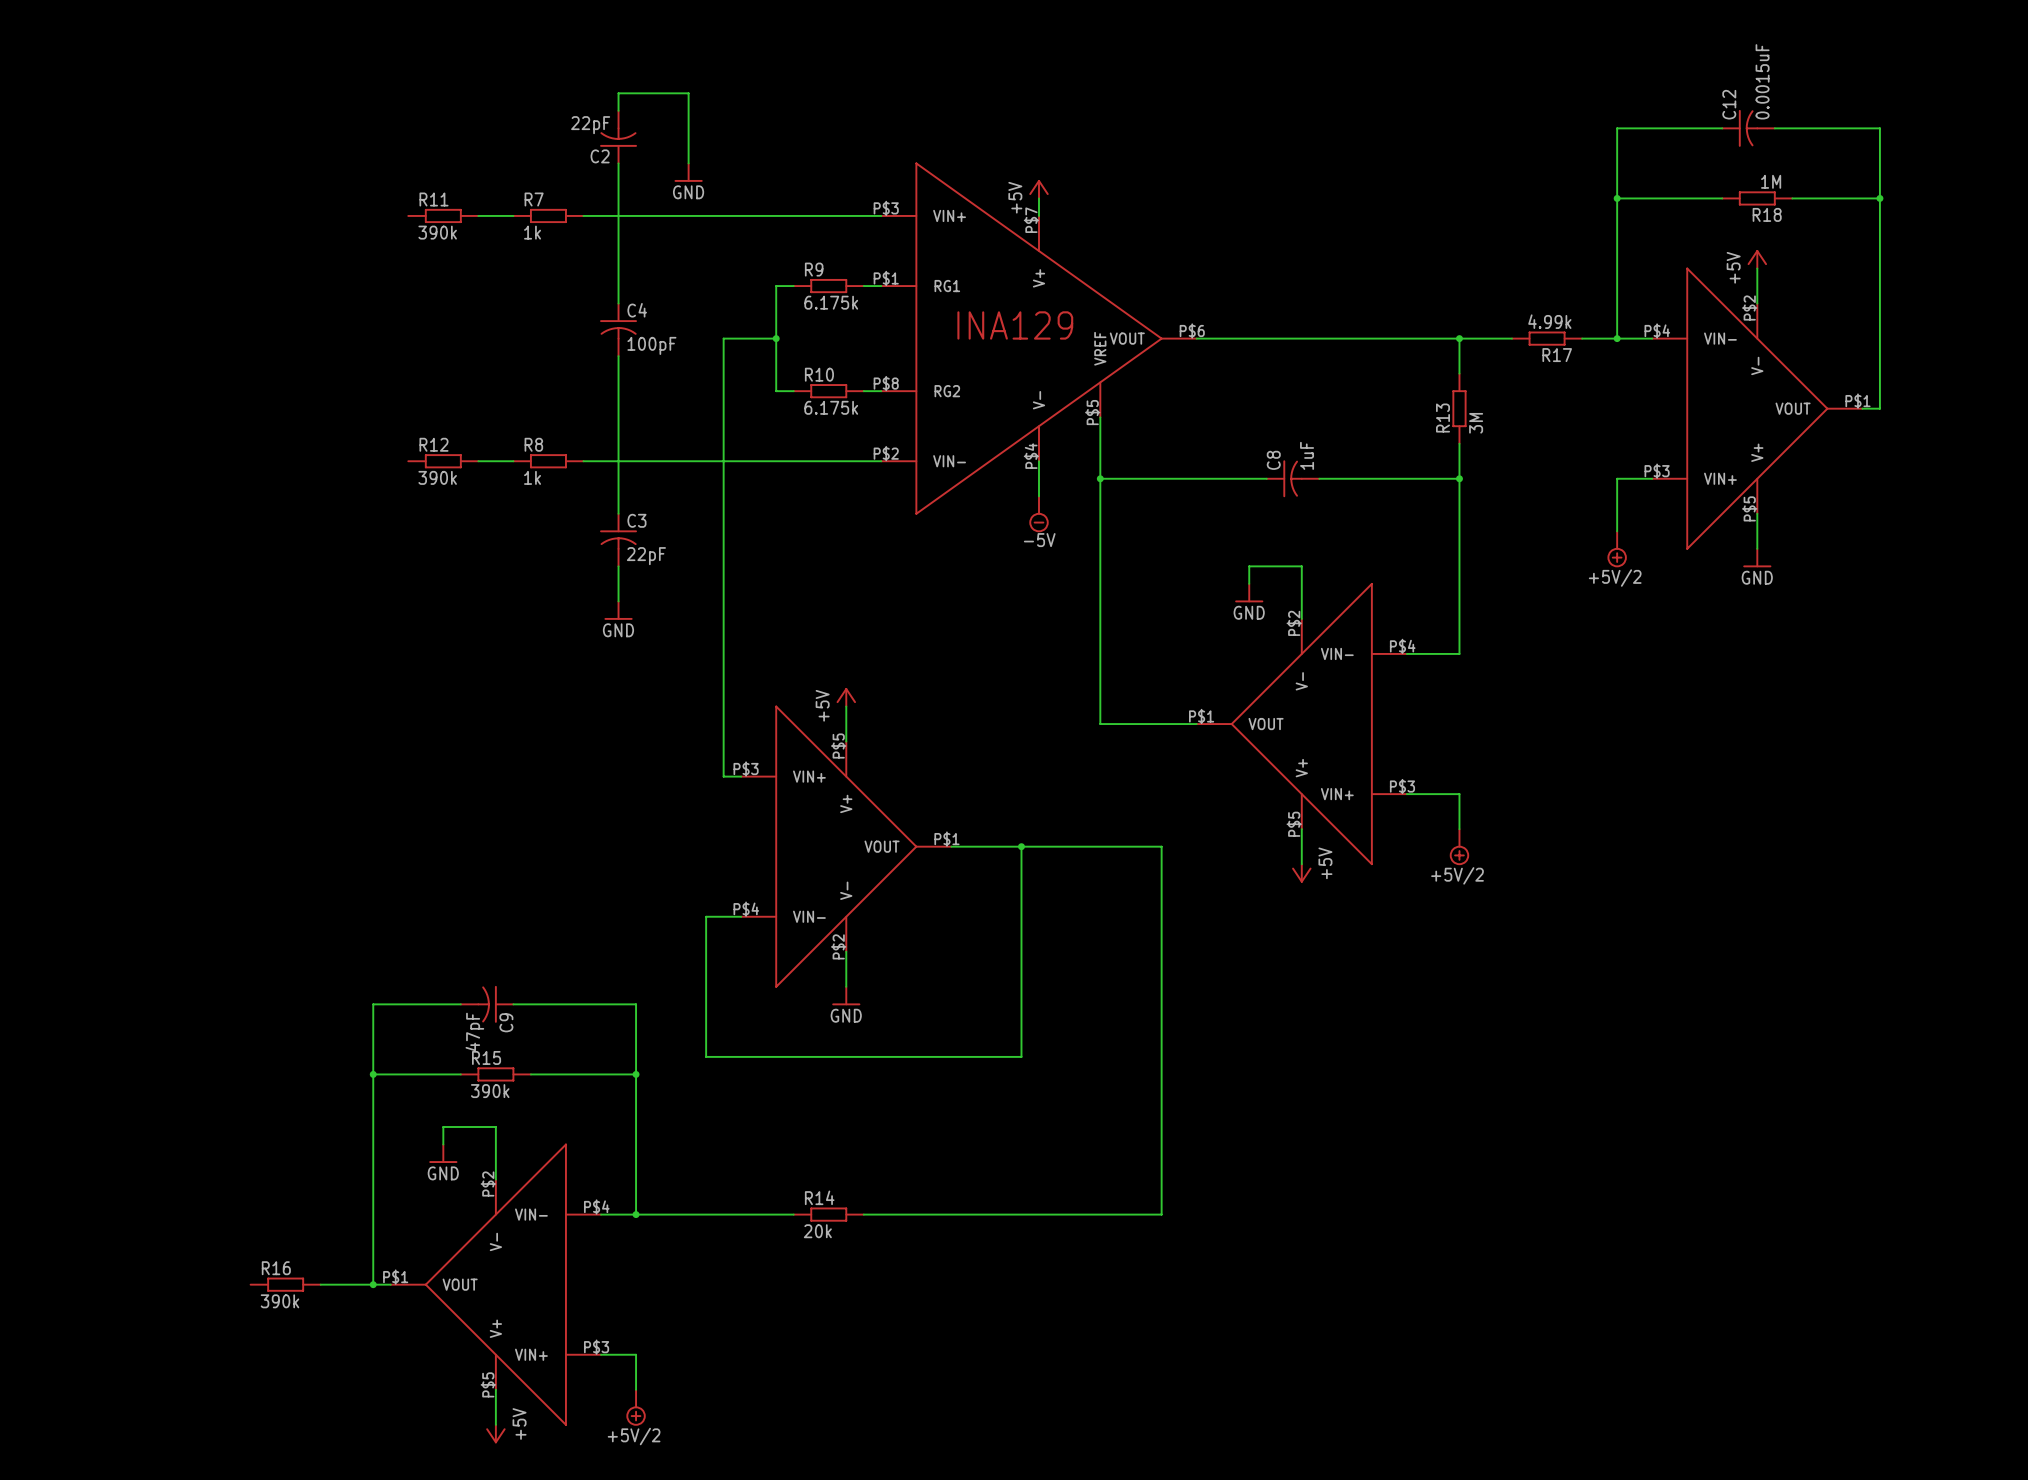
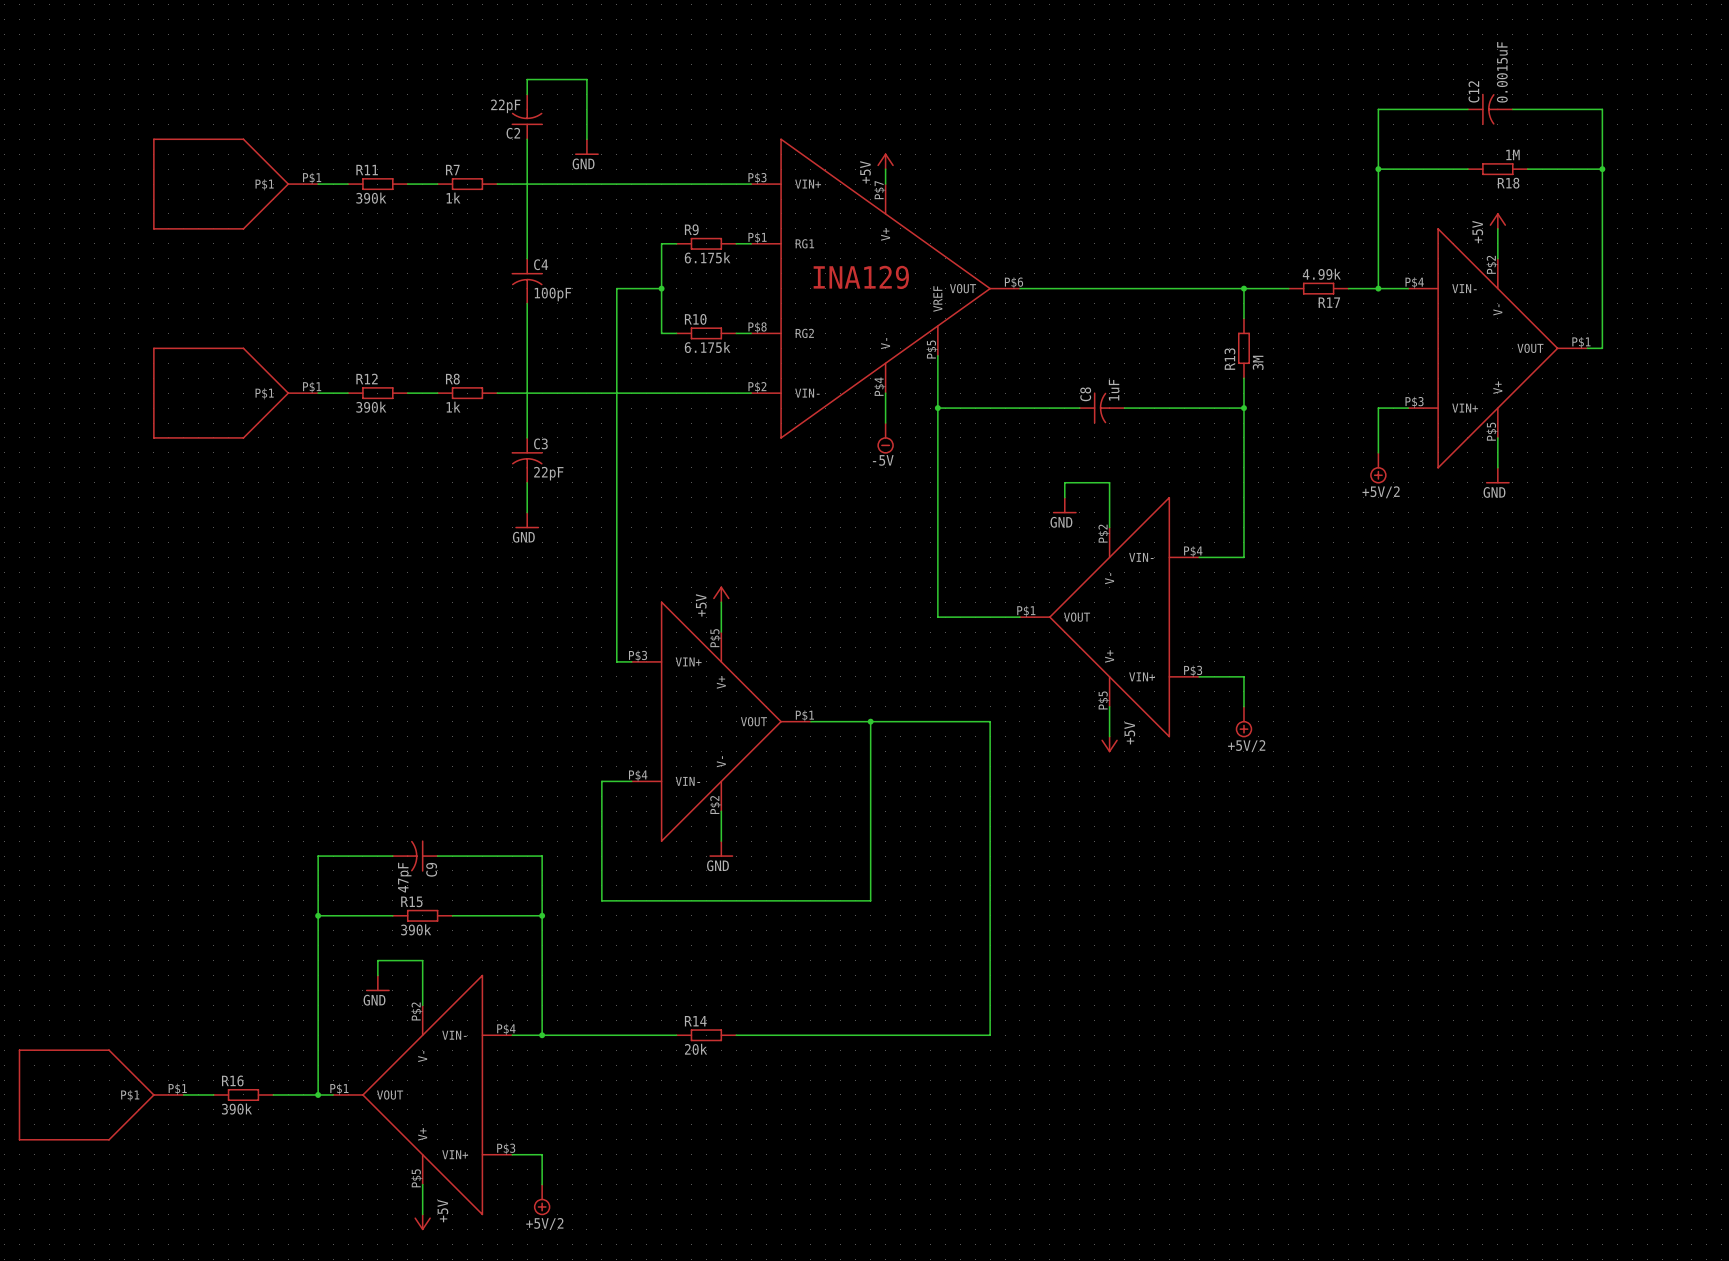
part: none -> (235, 184)
wire: none -> (318, 184) (348, 184)
part: none -> (235, 393)
wire: none -> (318, 393) (348, 393)
part: none -> (101, 1094)
wire: none -> (183, 1094) (213, 1094)

